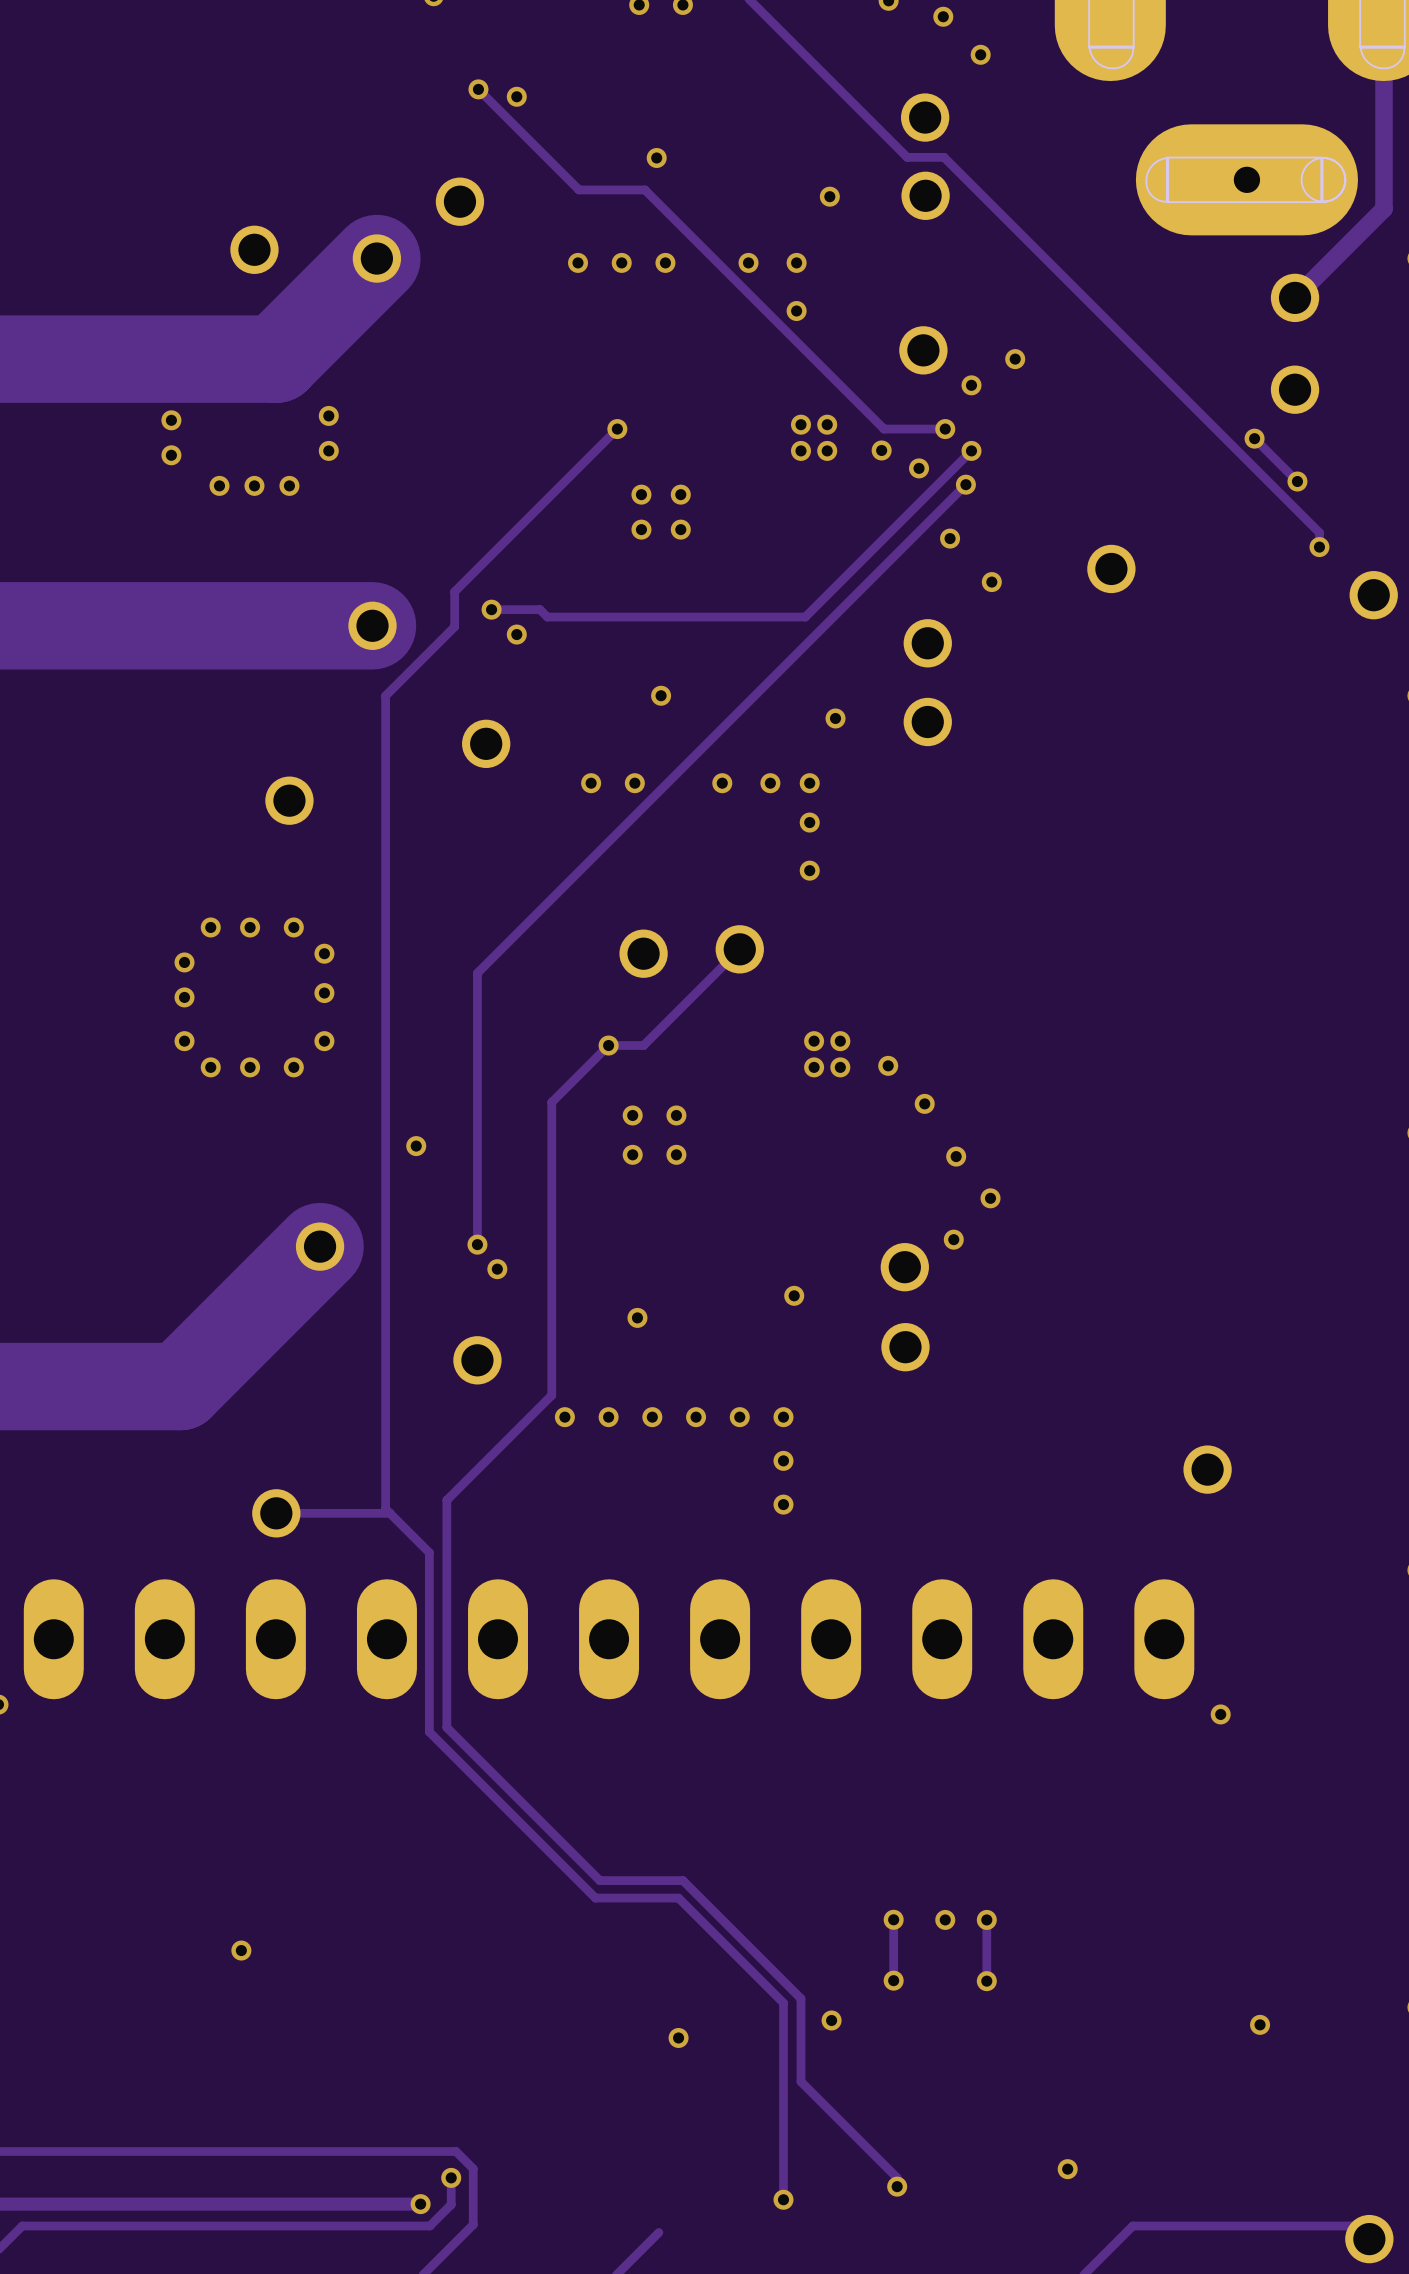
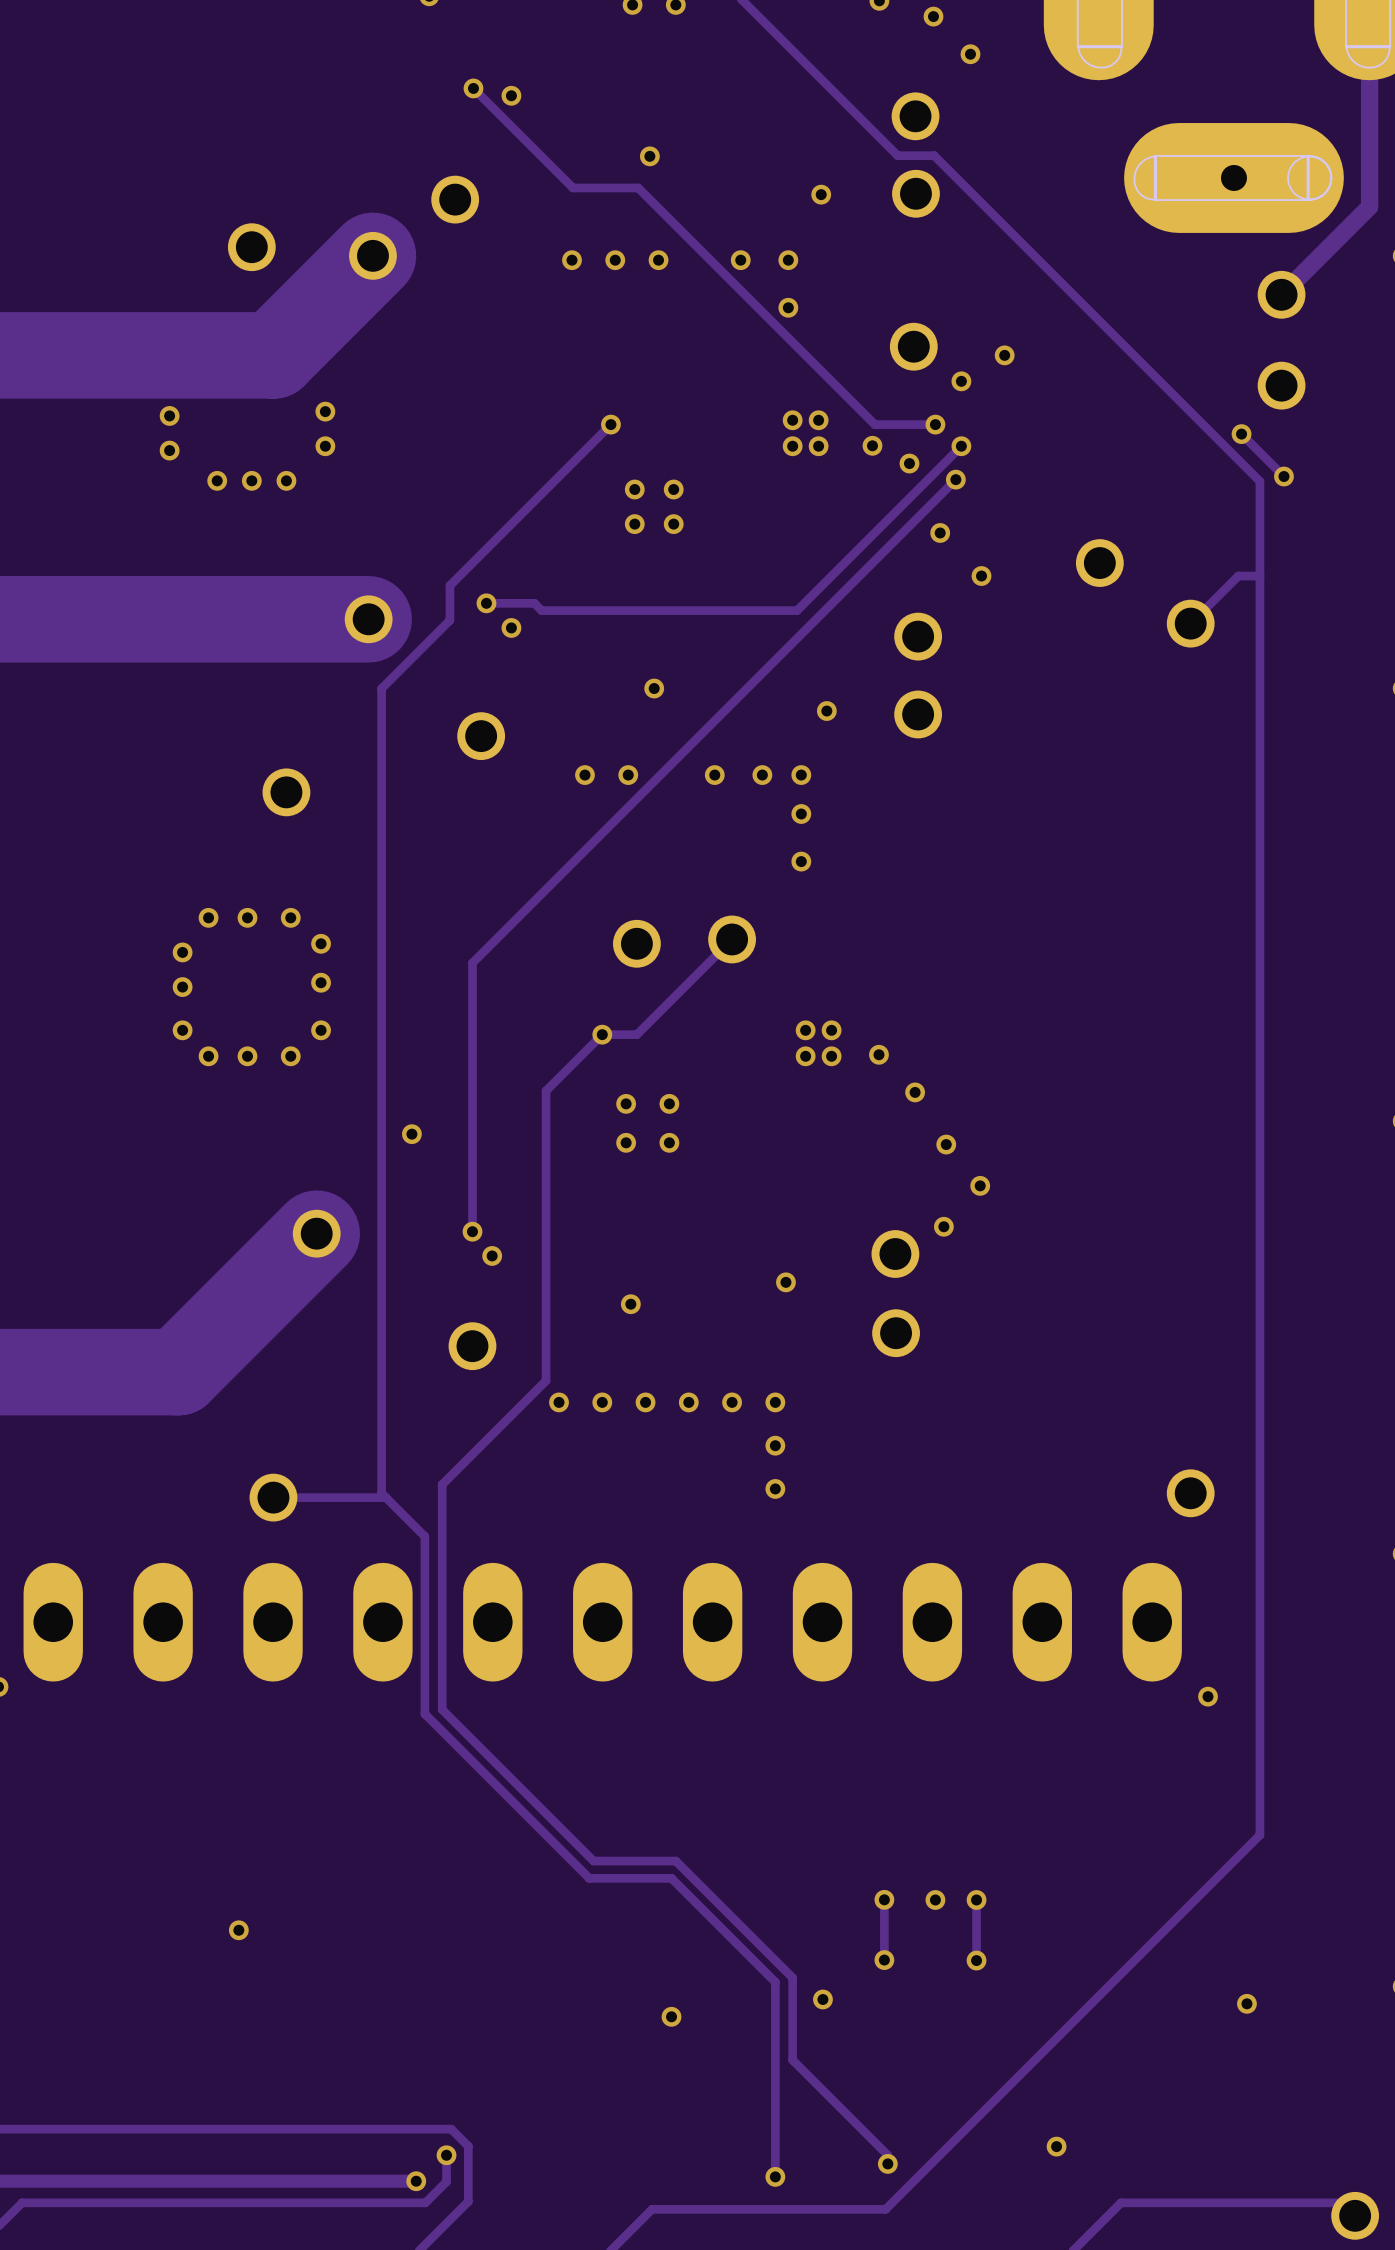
track: (1273, 486) (1319, 532) (1319, 547) -> (1259, 481) (1259, 1835) (885, 2209) (652, 2209)
via: (1319, 547) -> none
track: none -> (1259, 576) (1238, 576) (1190, 623)
part position: (1373, 595) -> (1190, 623)
part position: (1207, 1469) -> (1190, 1493)

